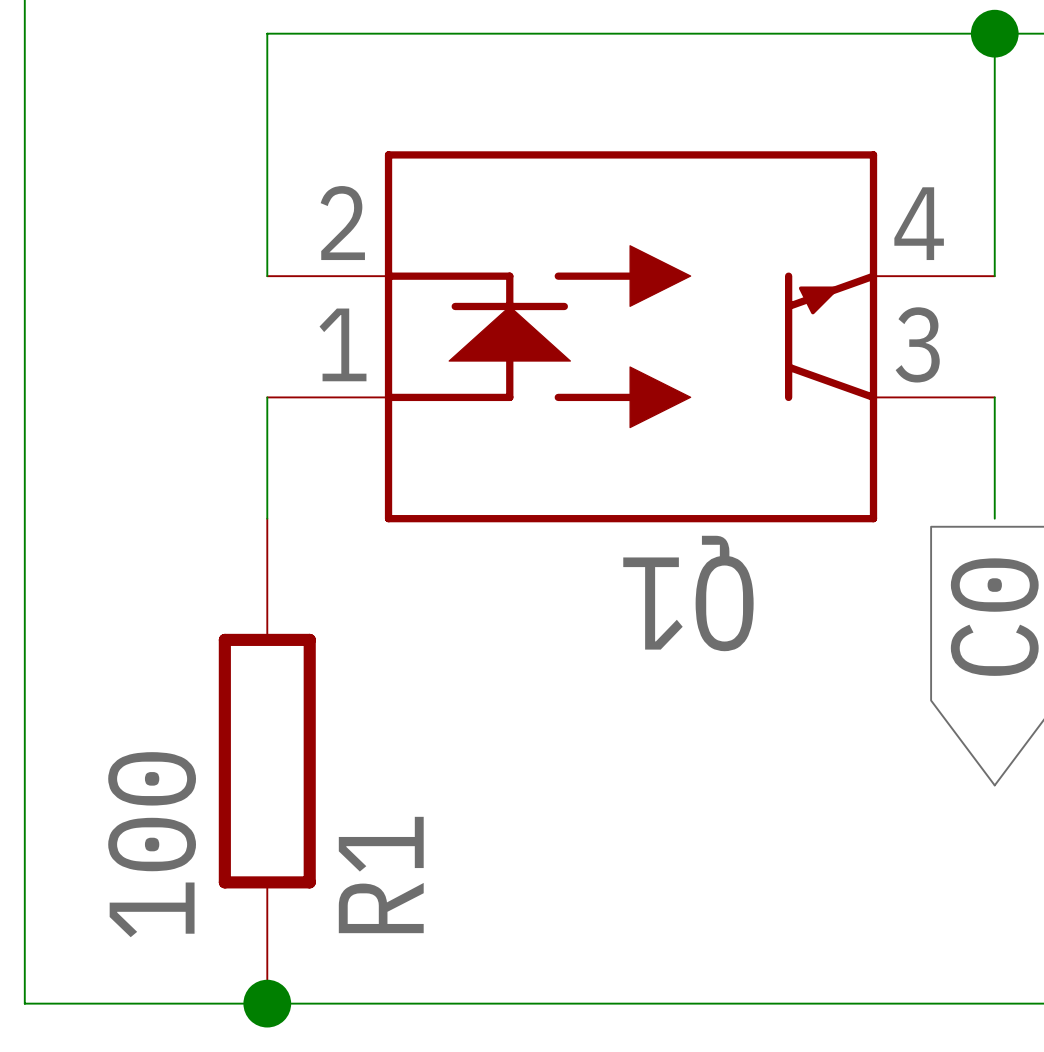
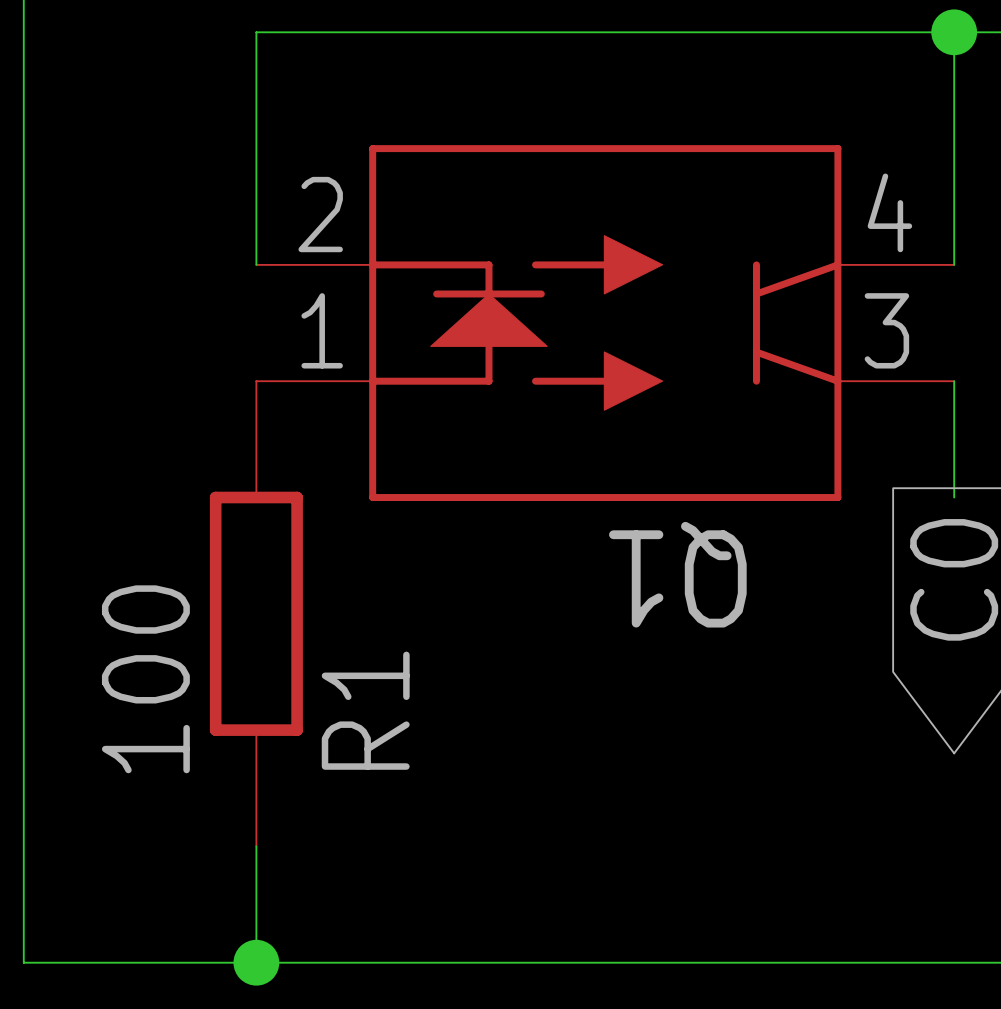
Q1 symbol: [267, 151, 995, 523] -> [256, 145, 955, 502]
R1 position: (267, 761) -> (256, 613)

